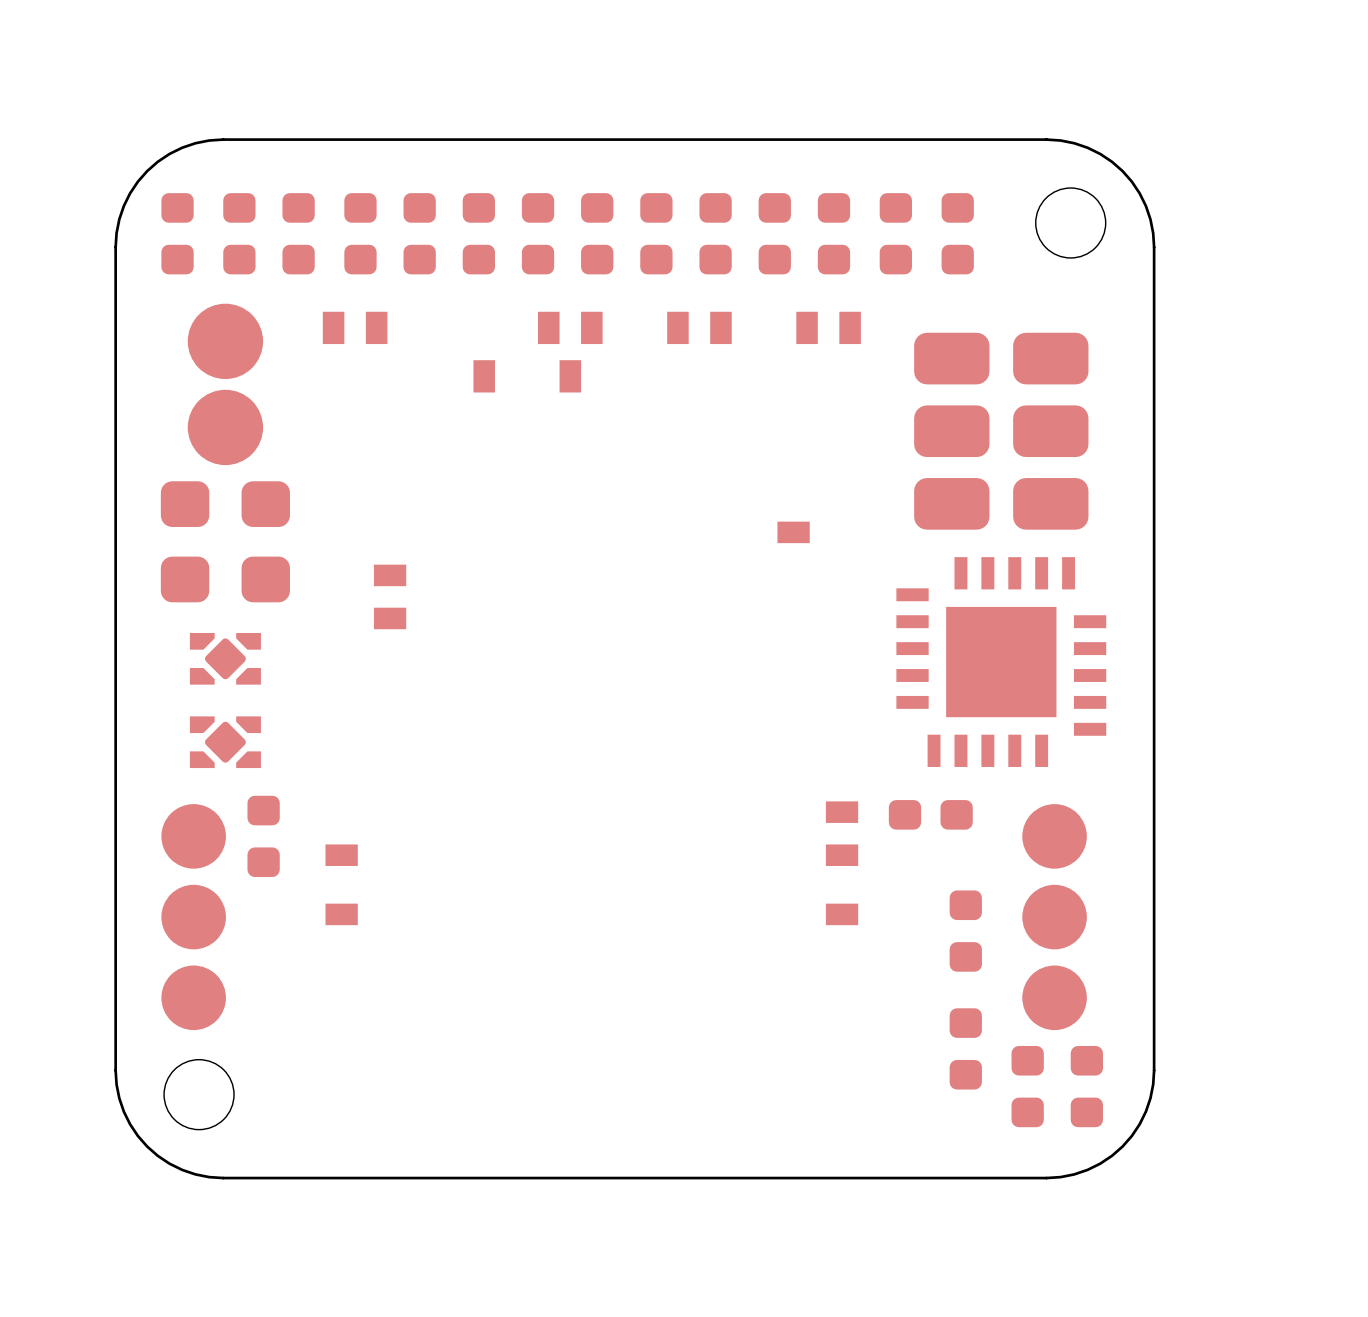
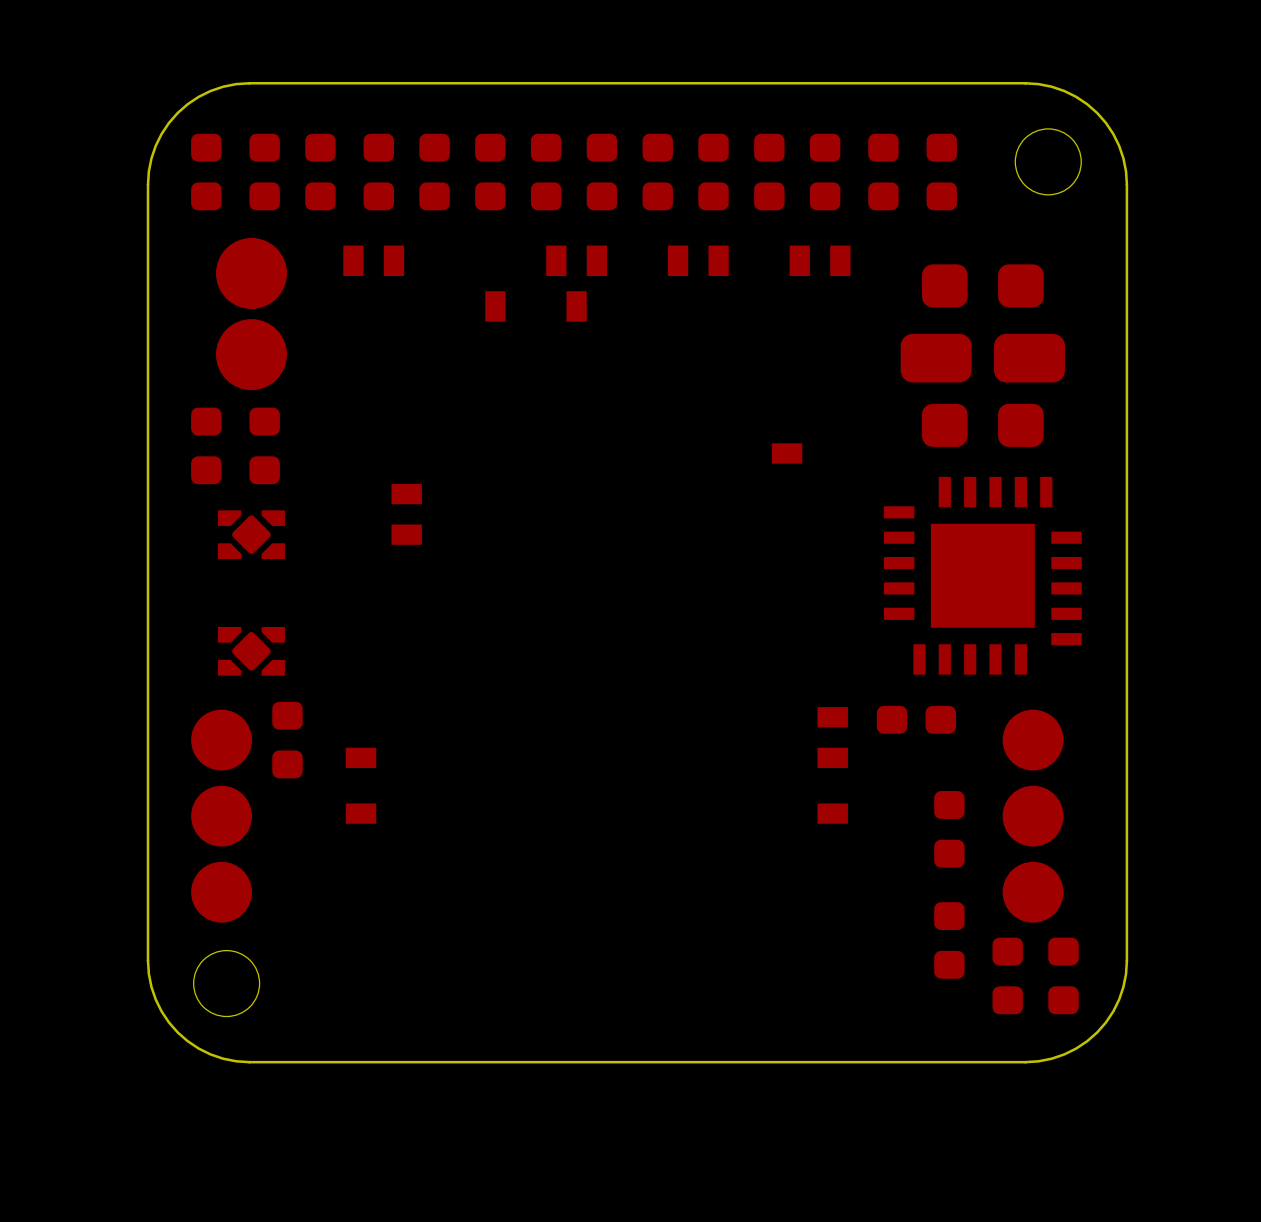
part footprint: [914, 332, 1089, 385] -> [921, 264, 1044, 308]
part footprint: [914, 478, 1089, 530] -> [921, 403, 1044, 447]
part footprint: [160, 481, 290, 527] -> [249, 407, 280, 485]
part: none -> (206, 445)
part: (225, 579) -> none
part position: (225, 658) -> (251, 534)

